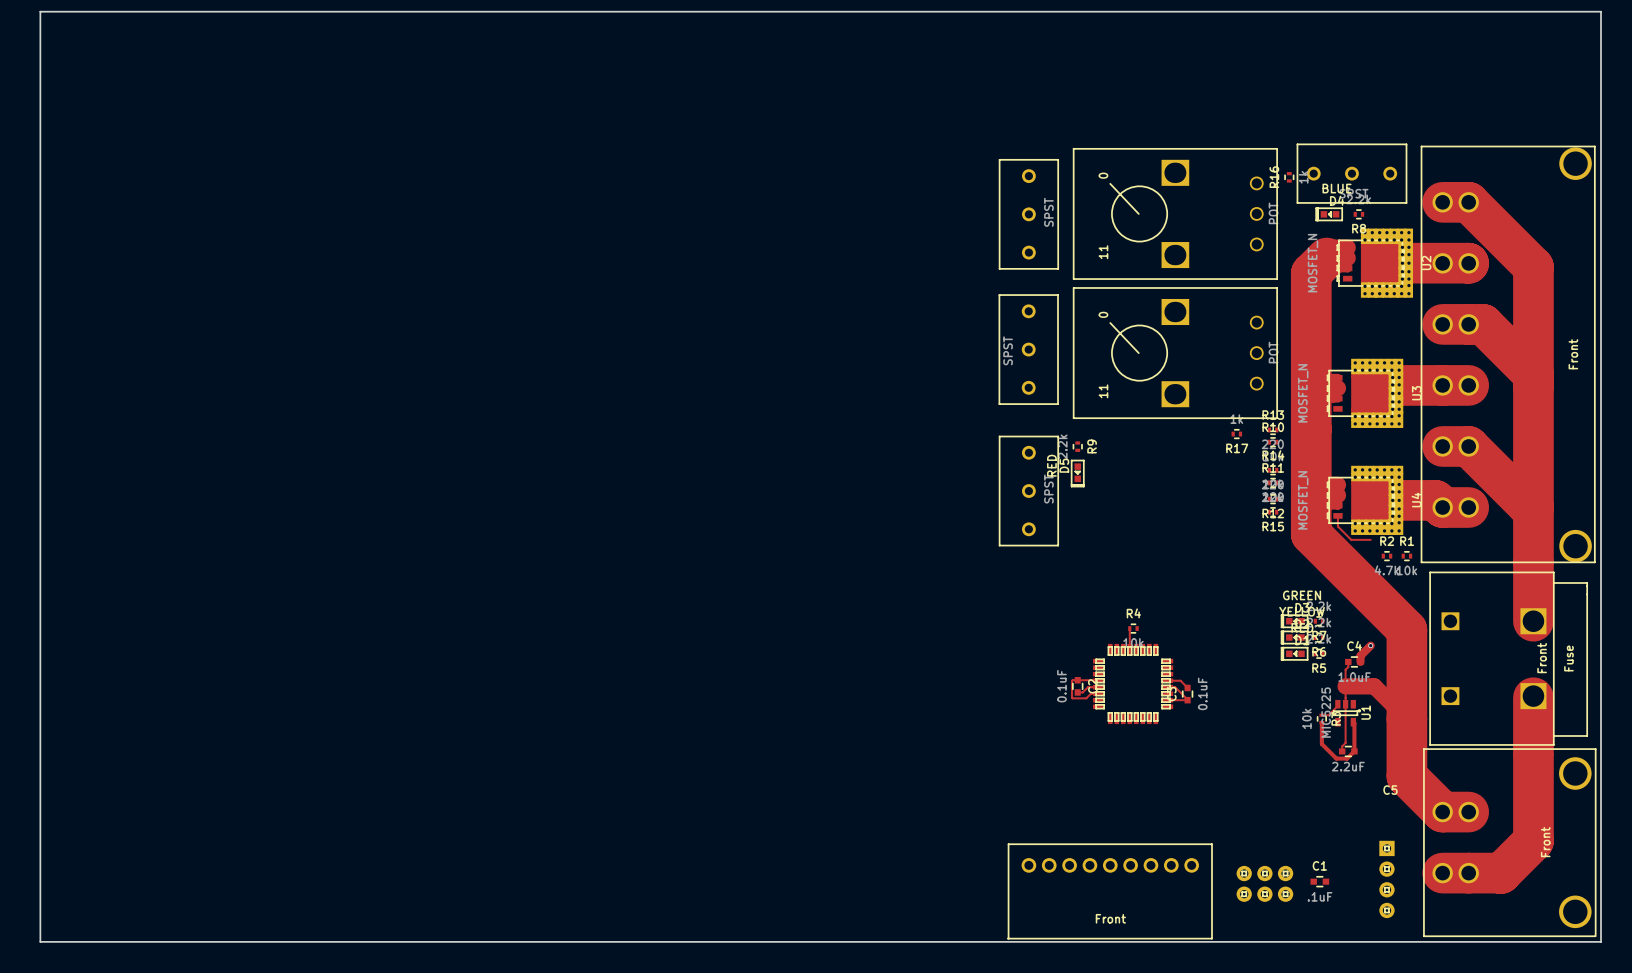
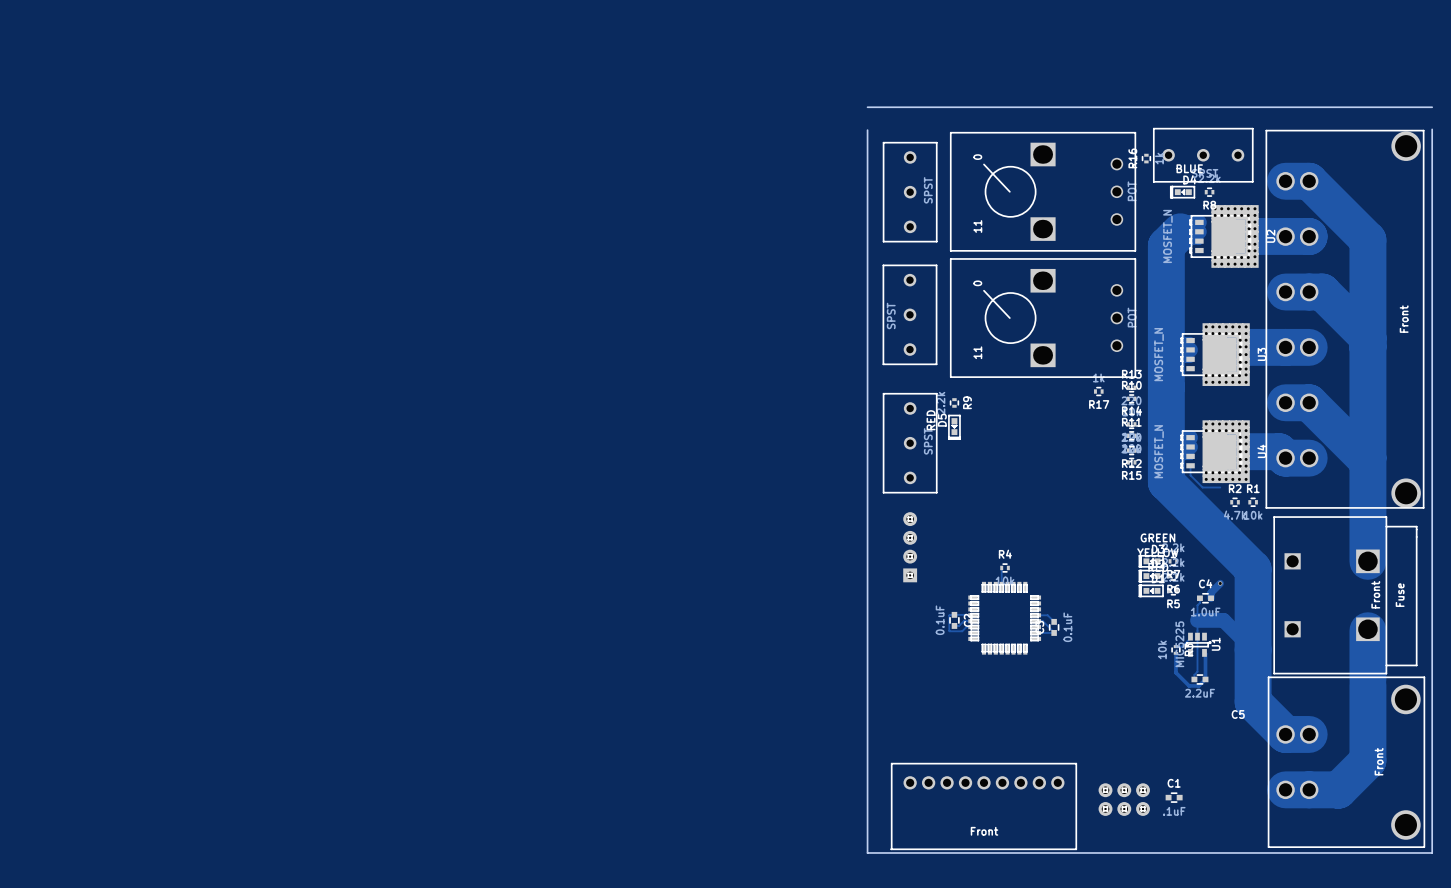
board edge: (40, 11) (40, 941) (1601, 941) (1601, 11) (40, 11) -> none
board edge: none -> (867, 107) (1432, 107)
board edge: none -> (1432, 129) (1432, 852) (867, 852) (867, 130)
part: none -> (910, 547)
part: (1386, 879) -> none

